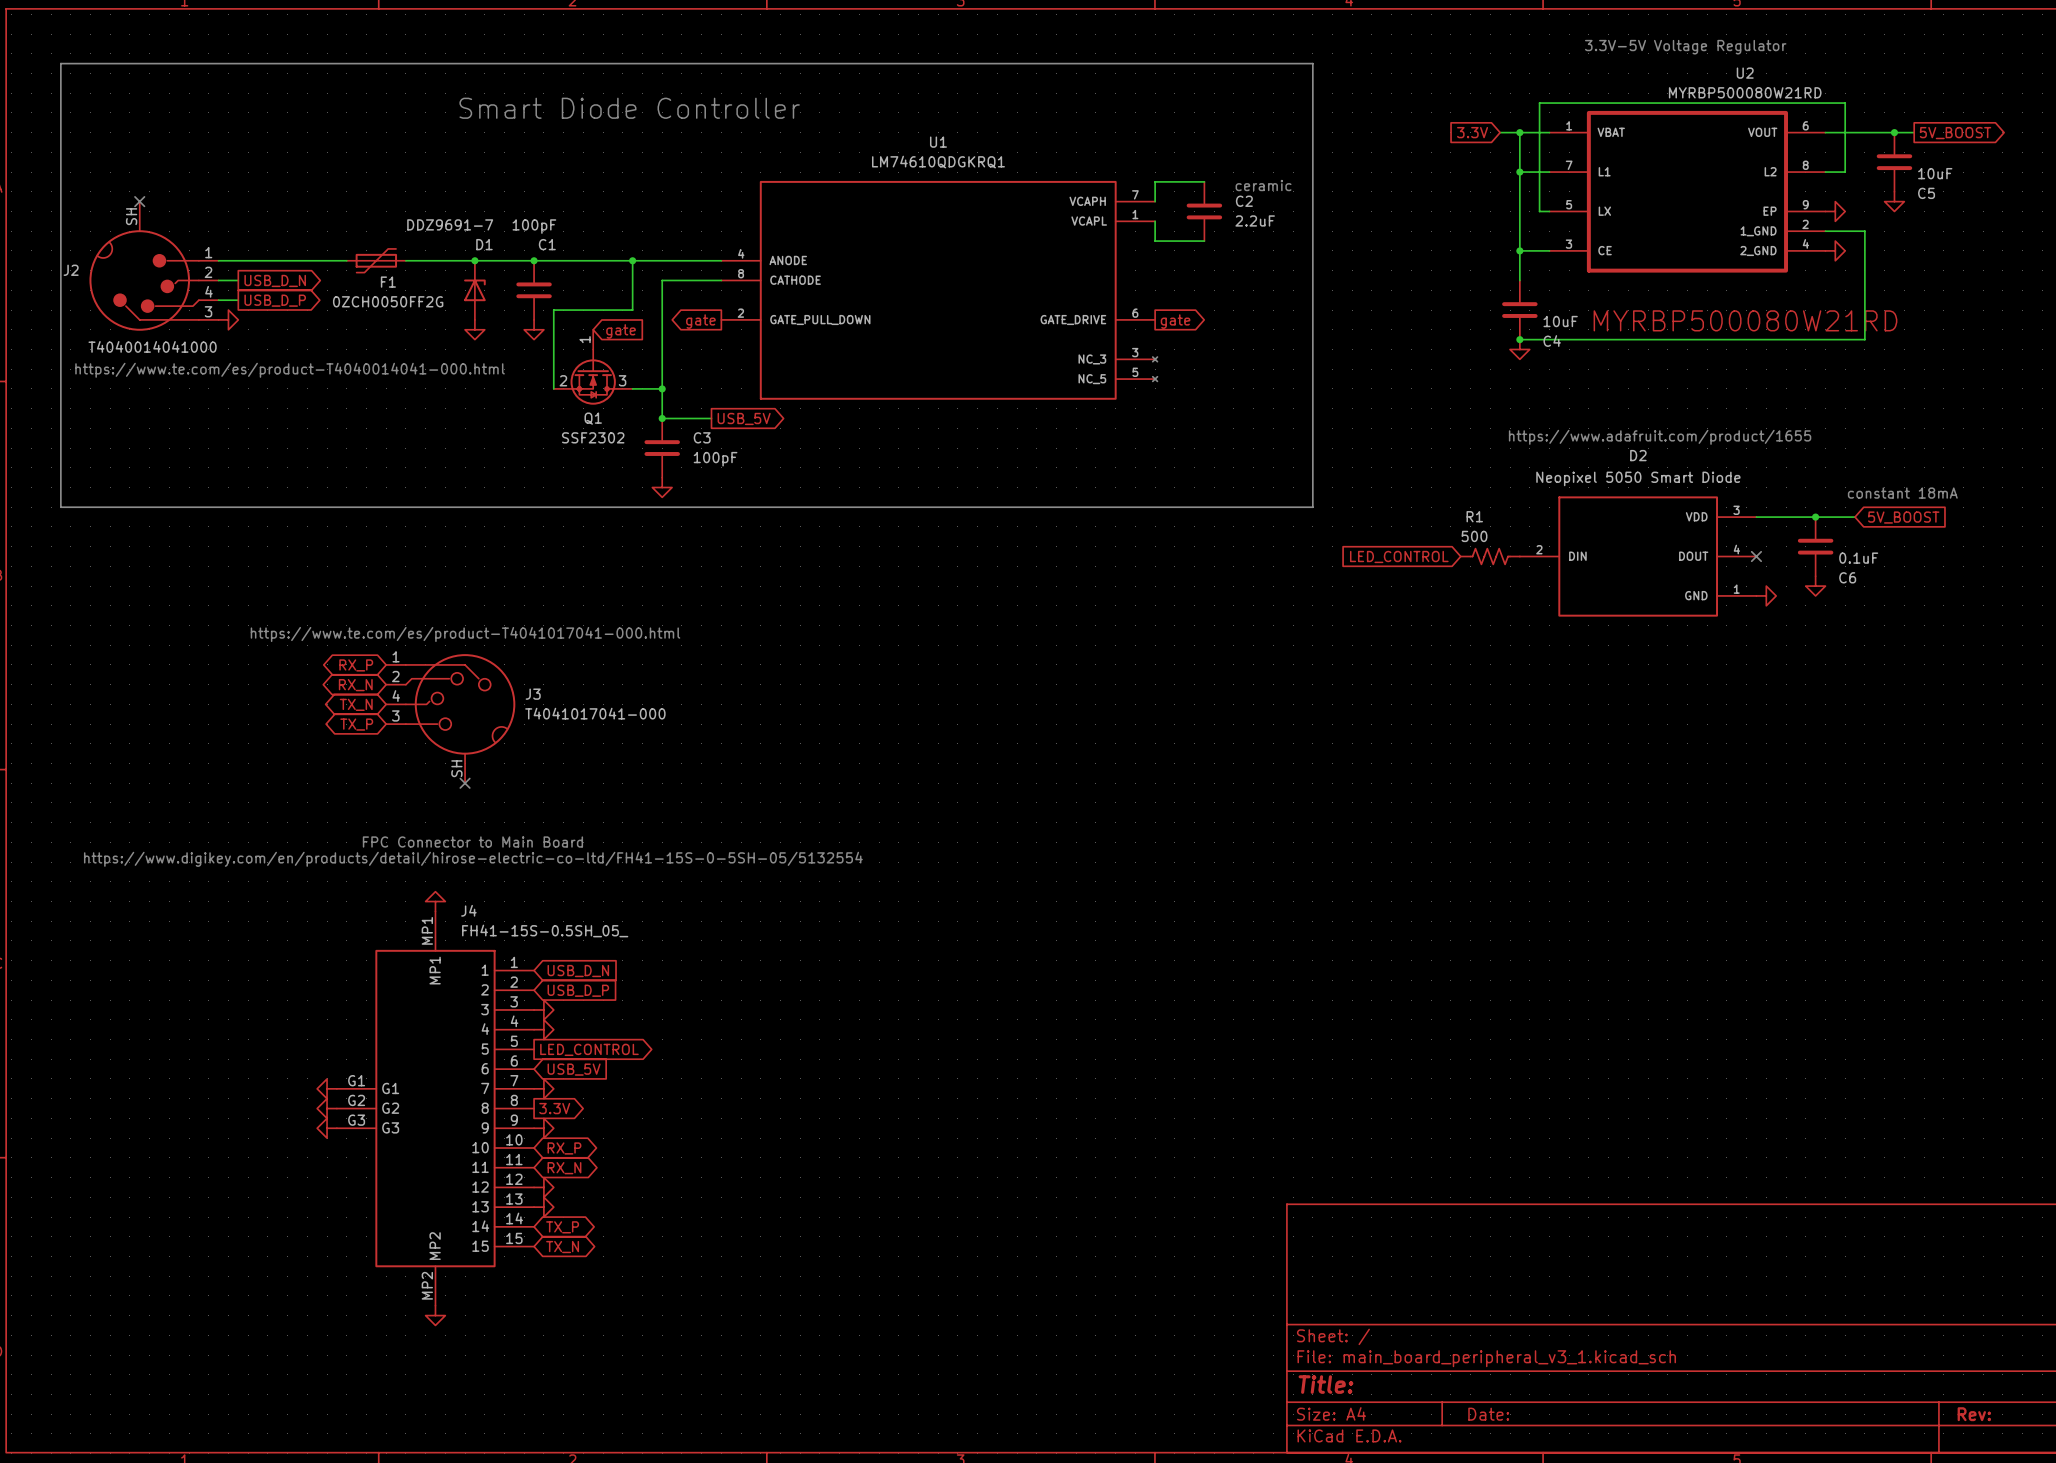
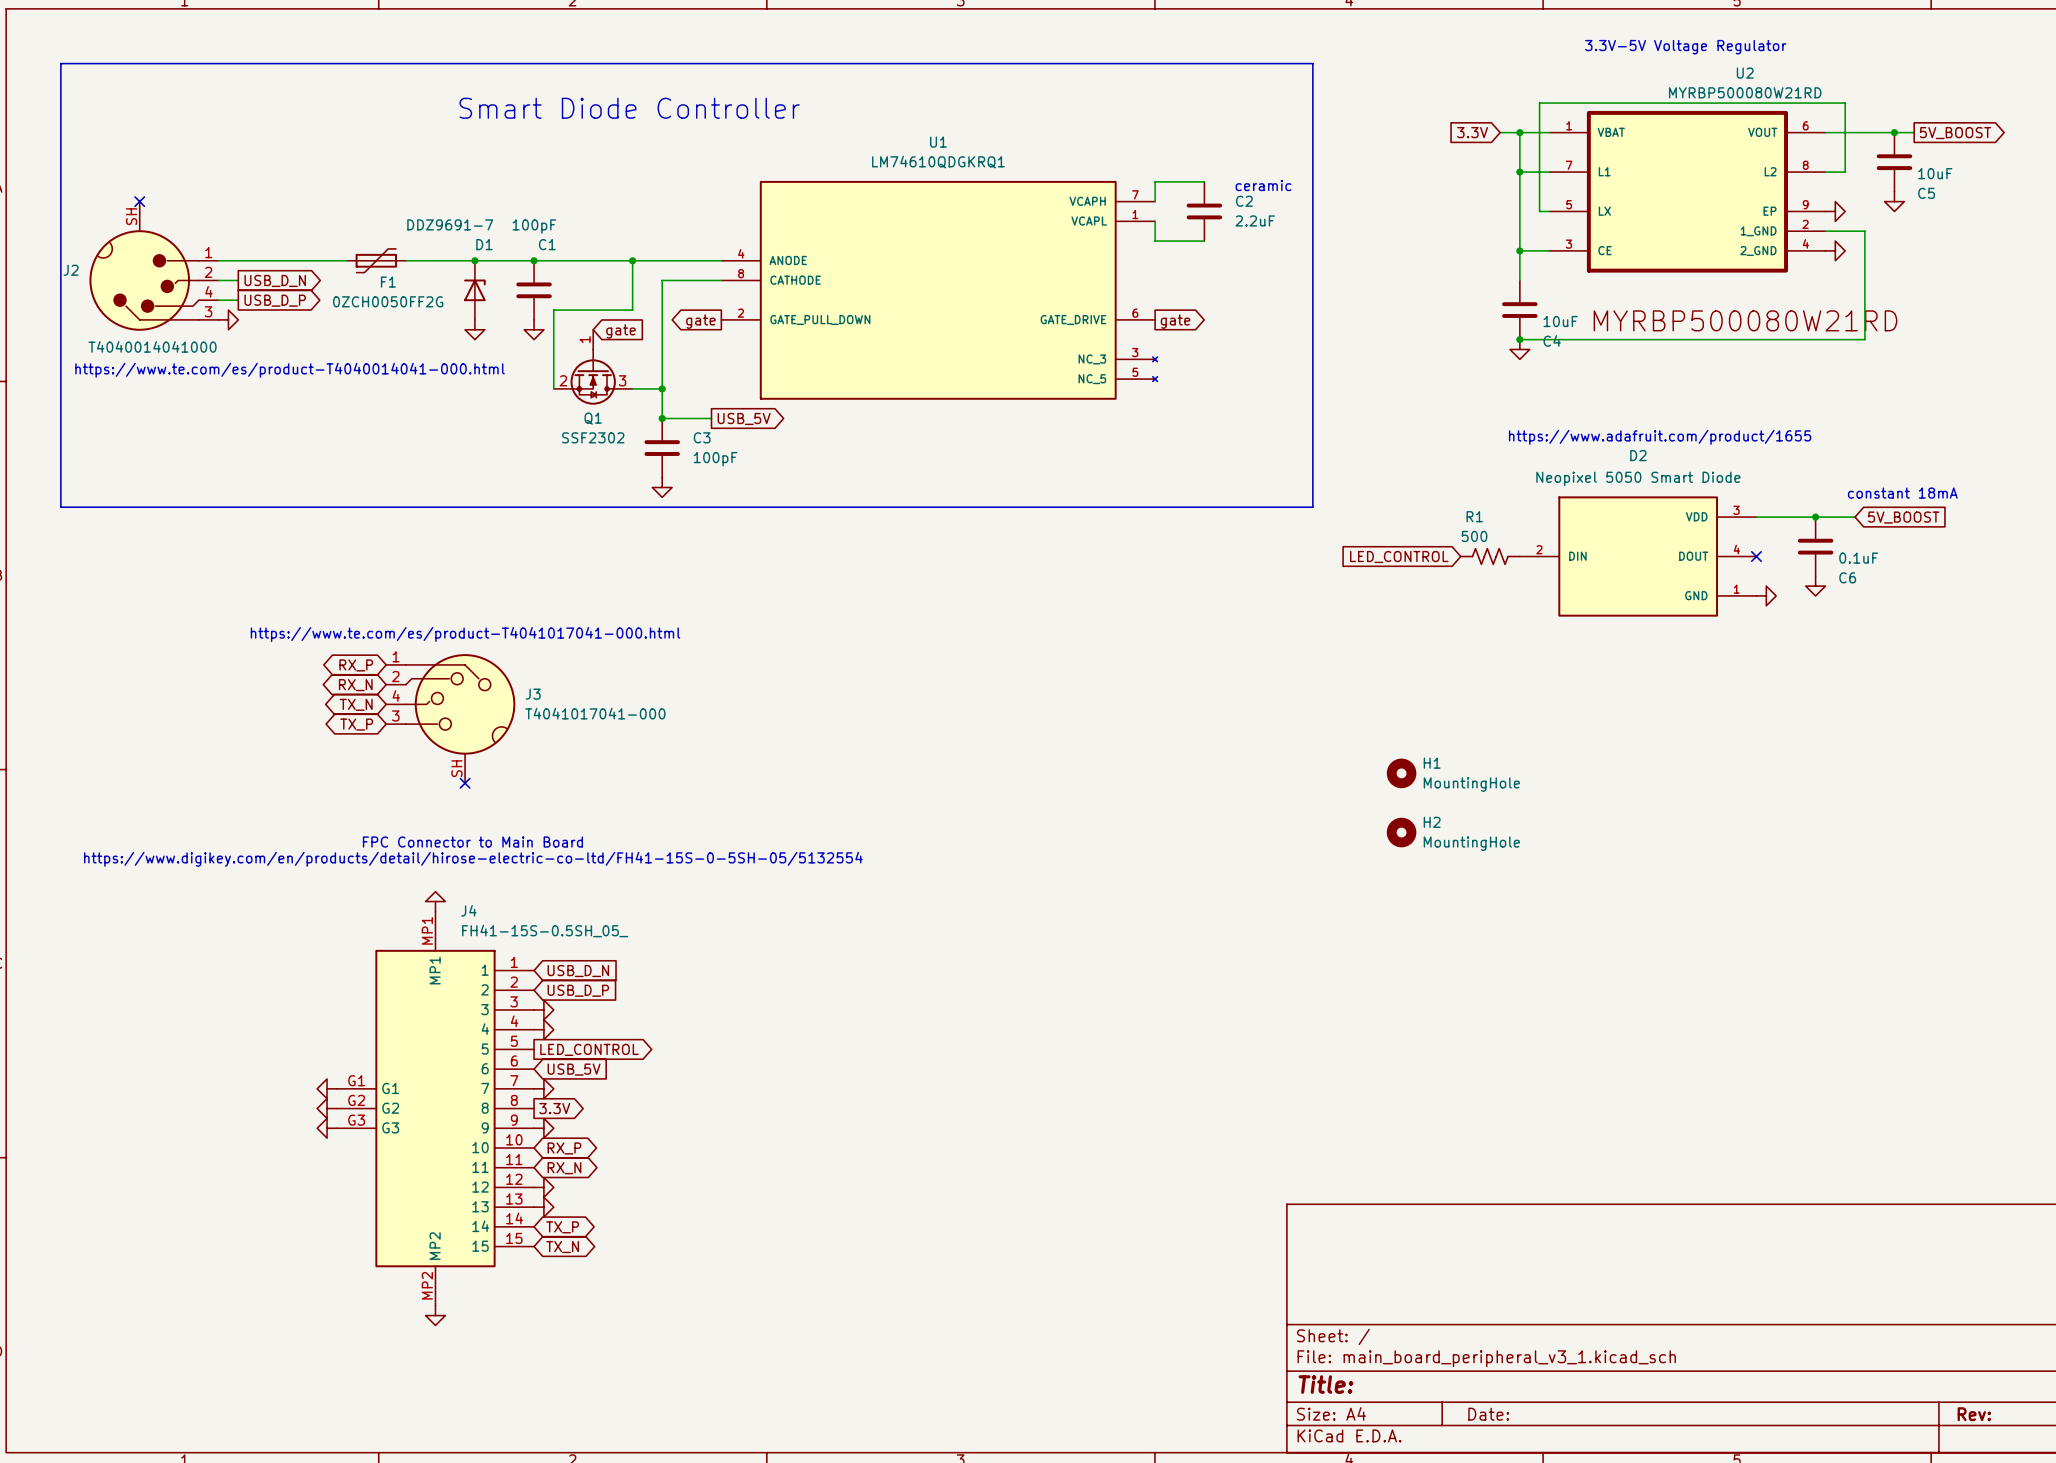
H1: none -> MountingHole (1401, 773)
H2: none -> MountingHole (1401, 832)

